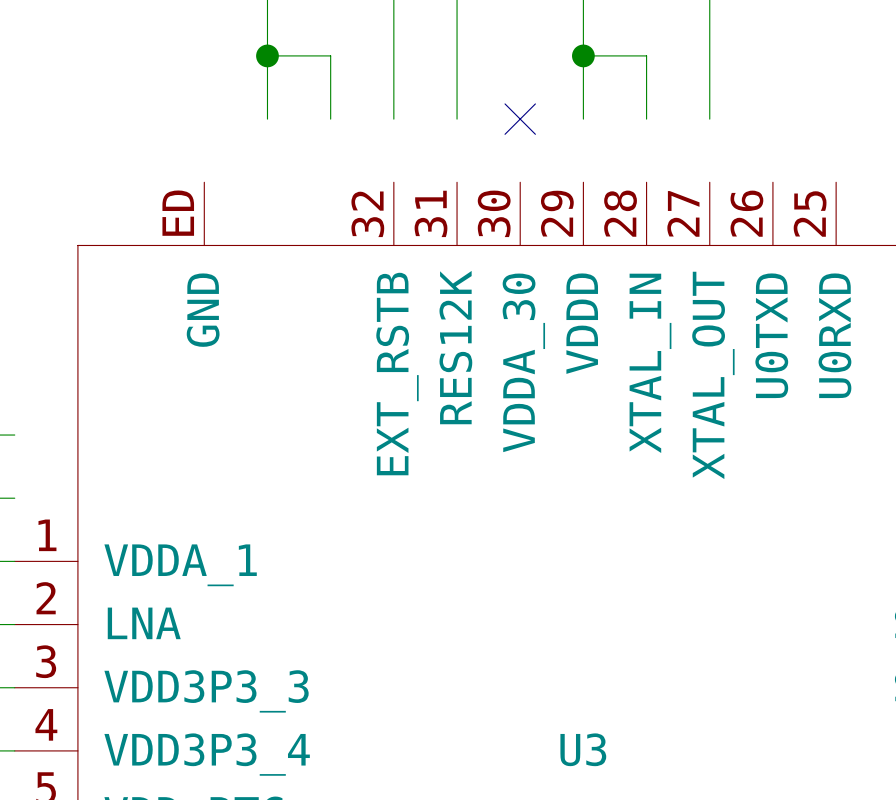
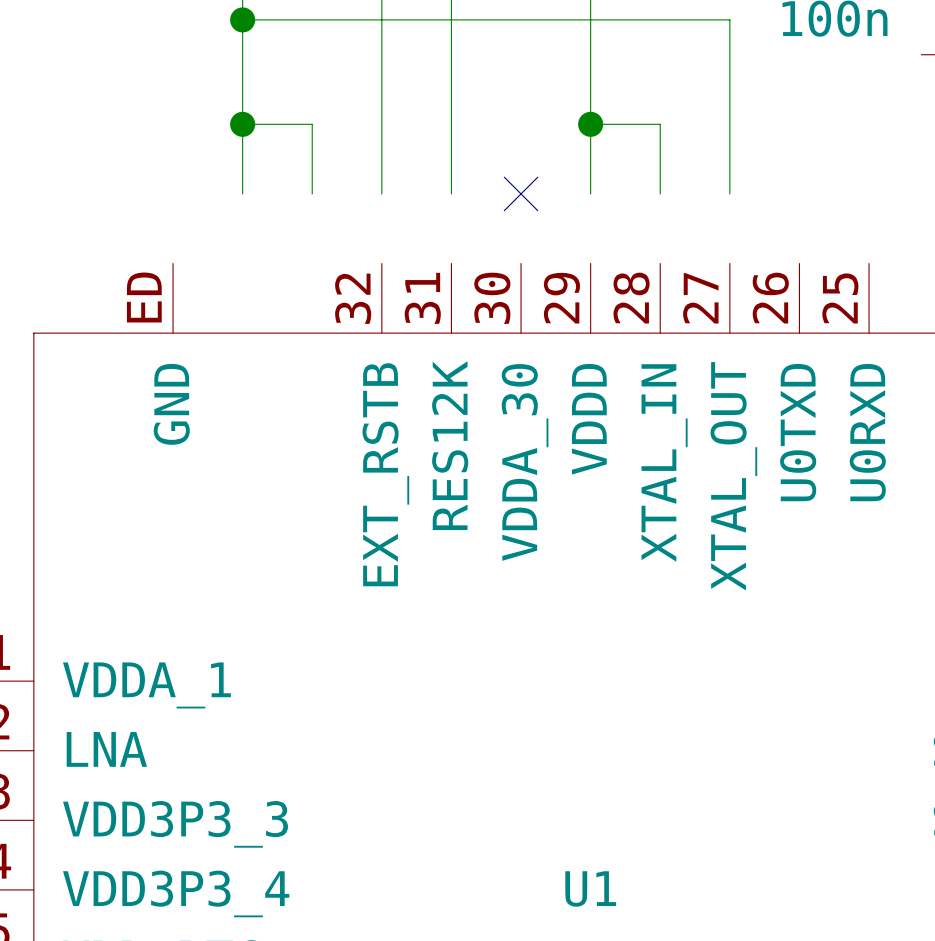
U3 name: U3 (583, 749) -> U1 (590, 888)

